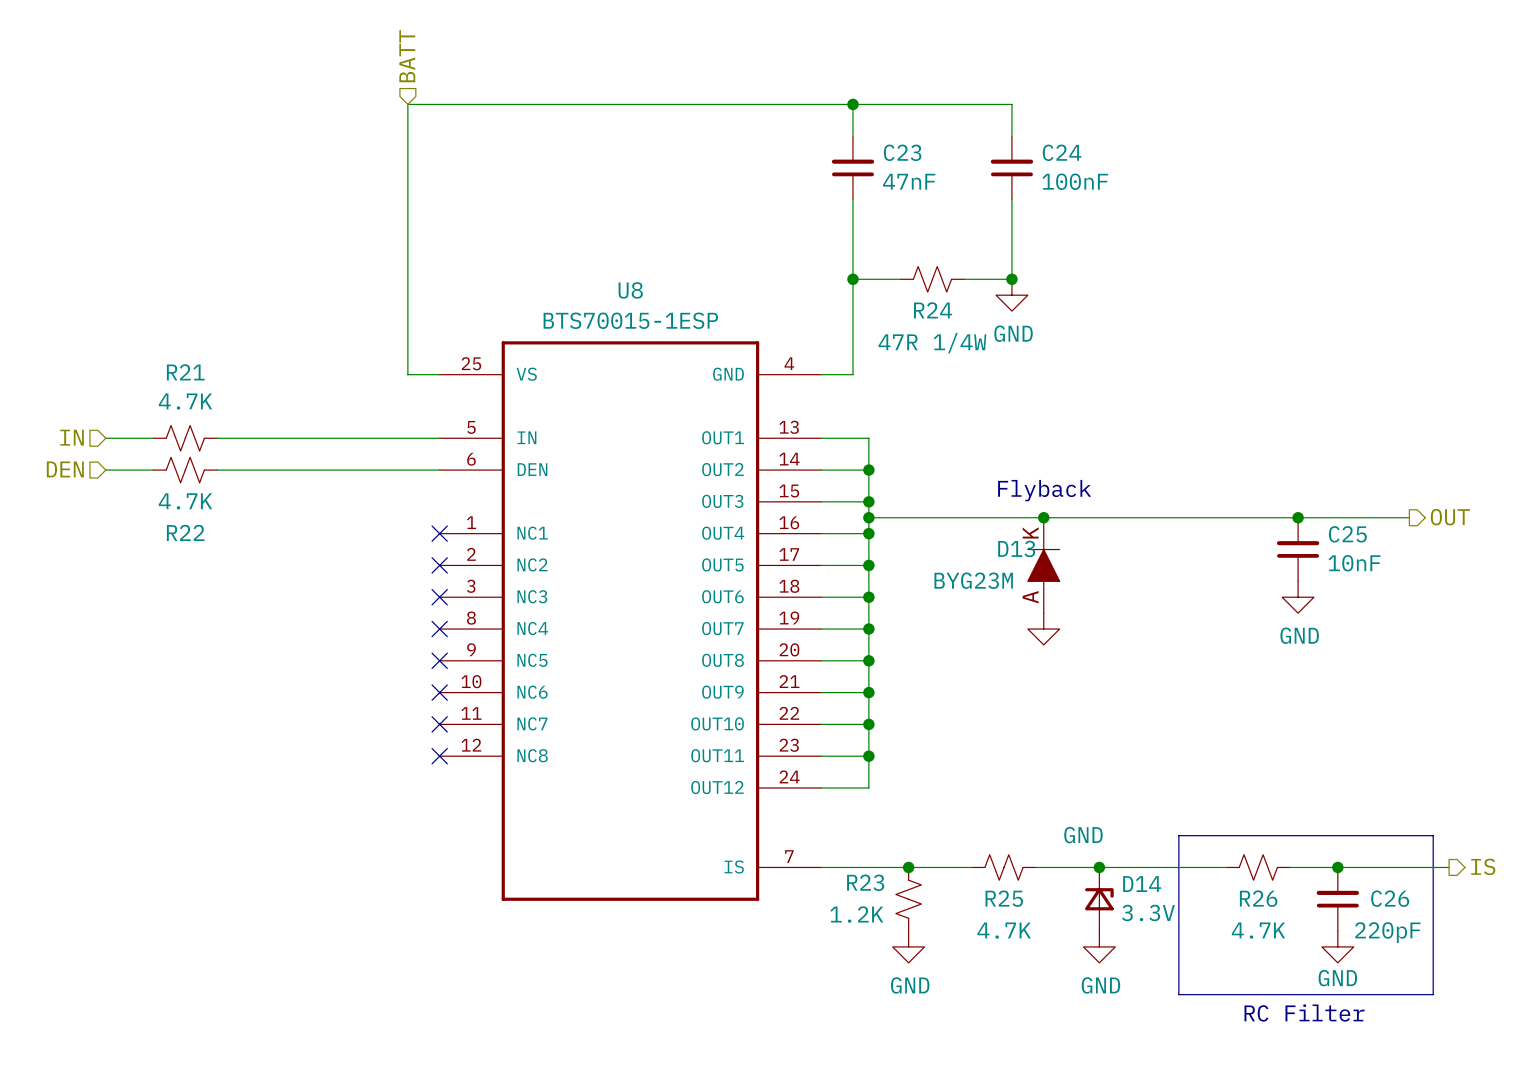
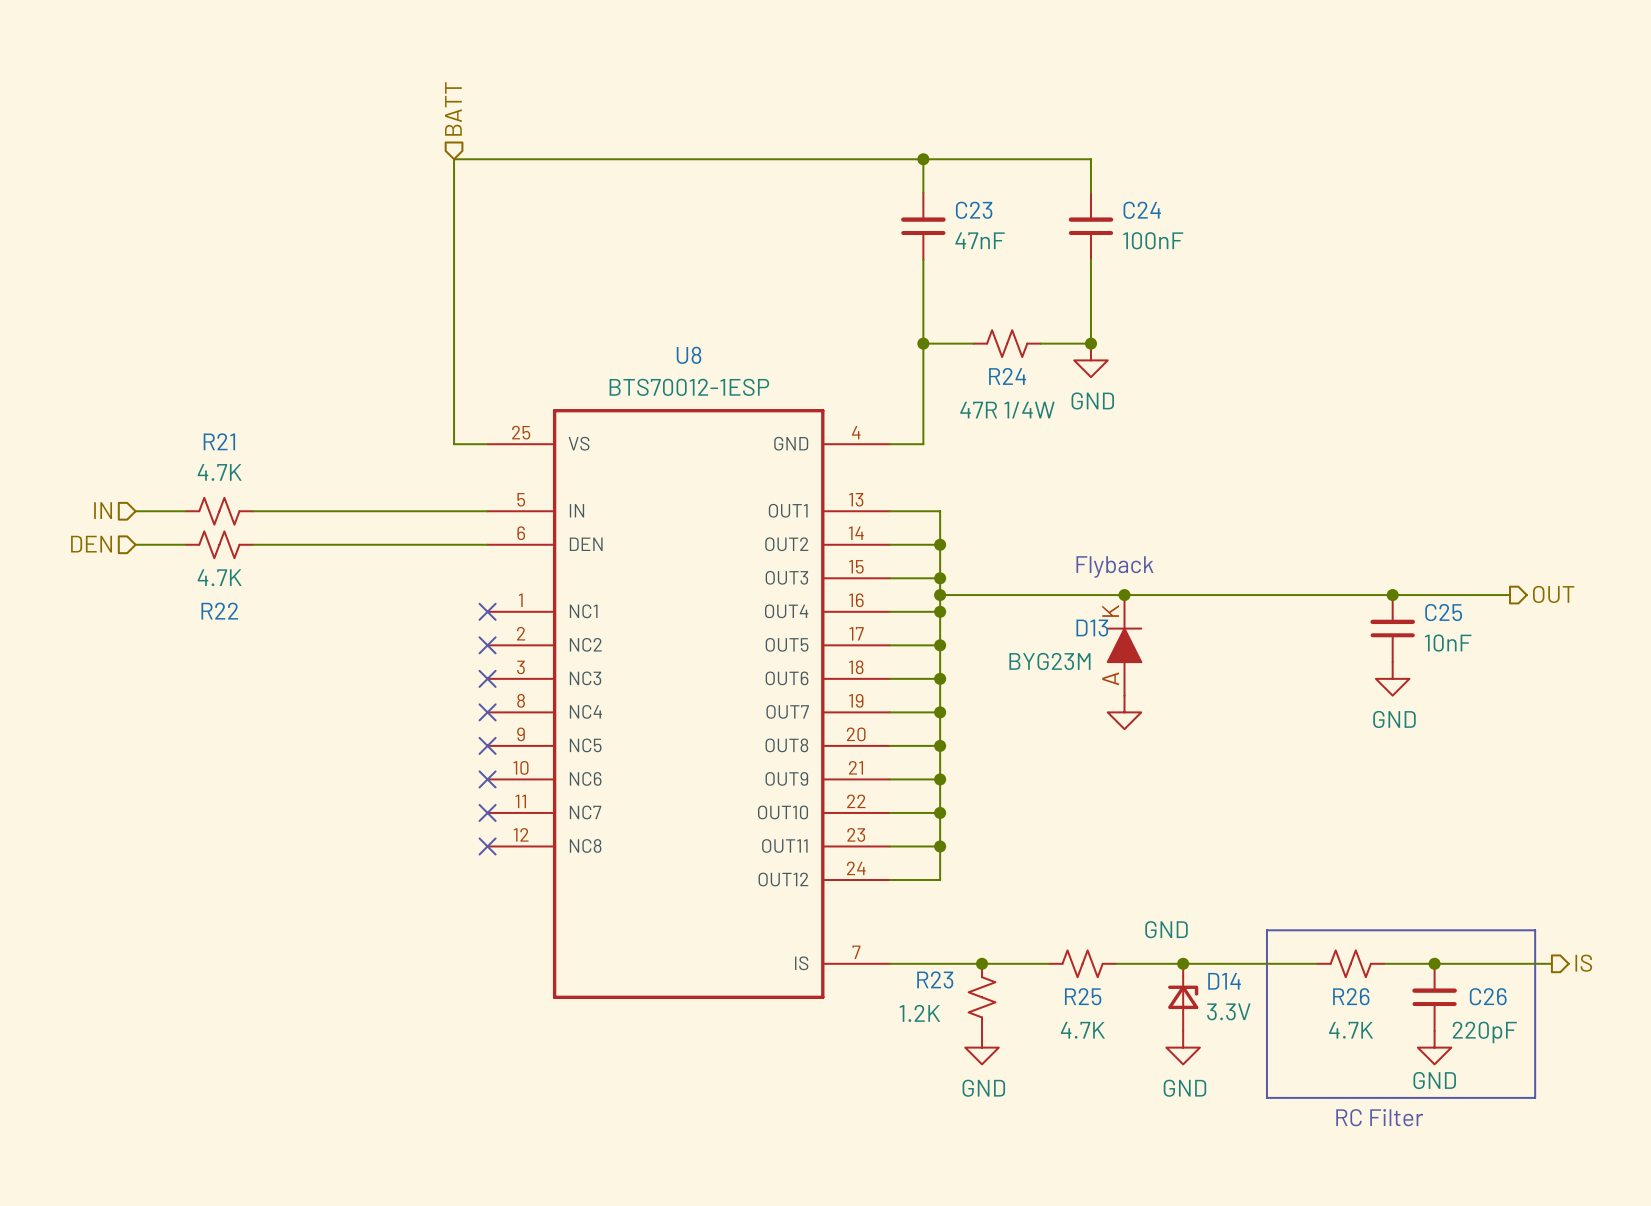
U8 value: BTS70015-1ESP (630, 320) -> BTS70012-1ESP (689, 387)

